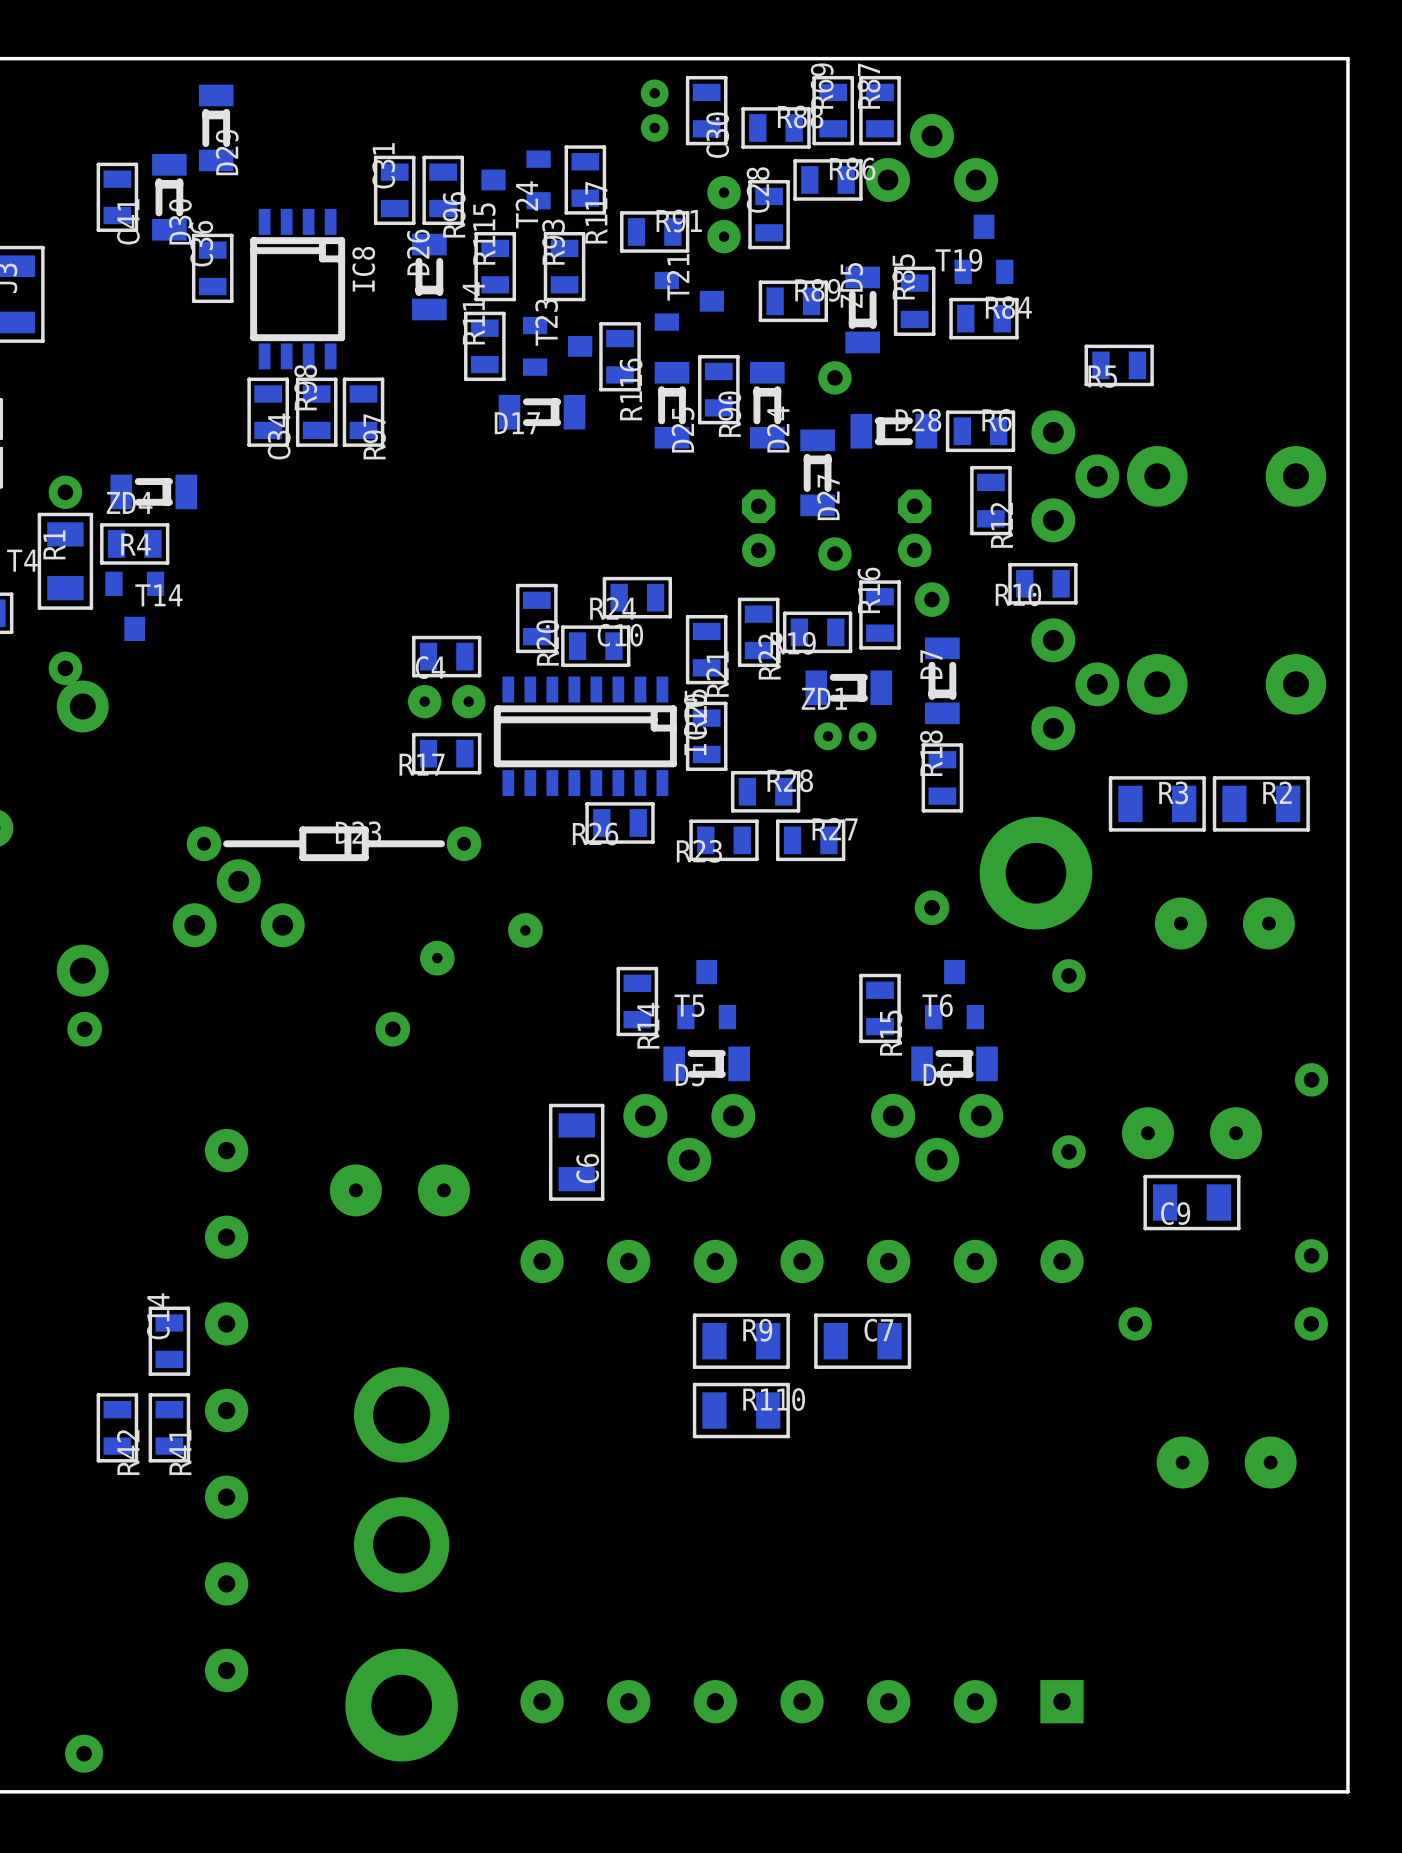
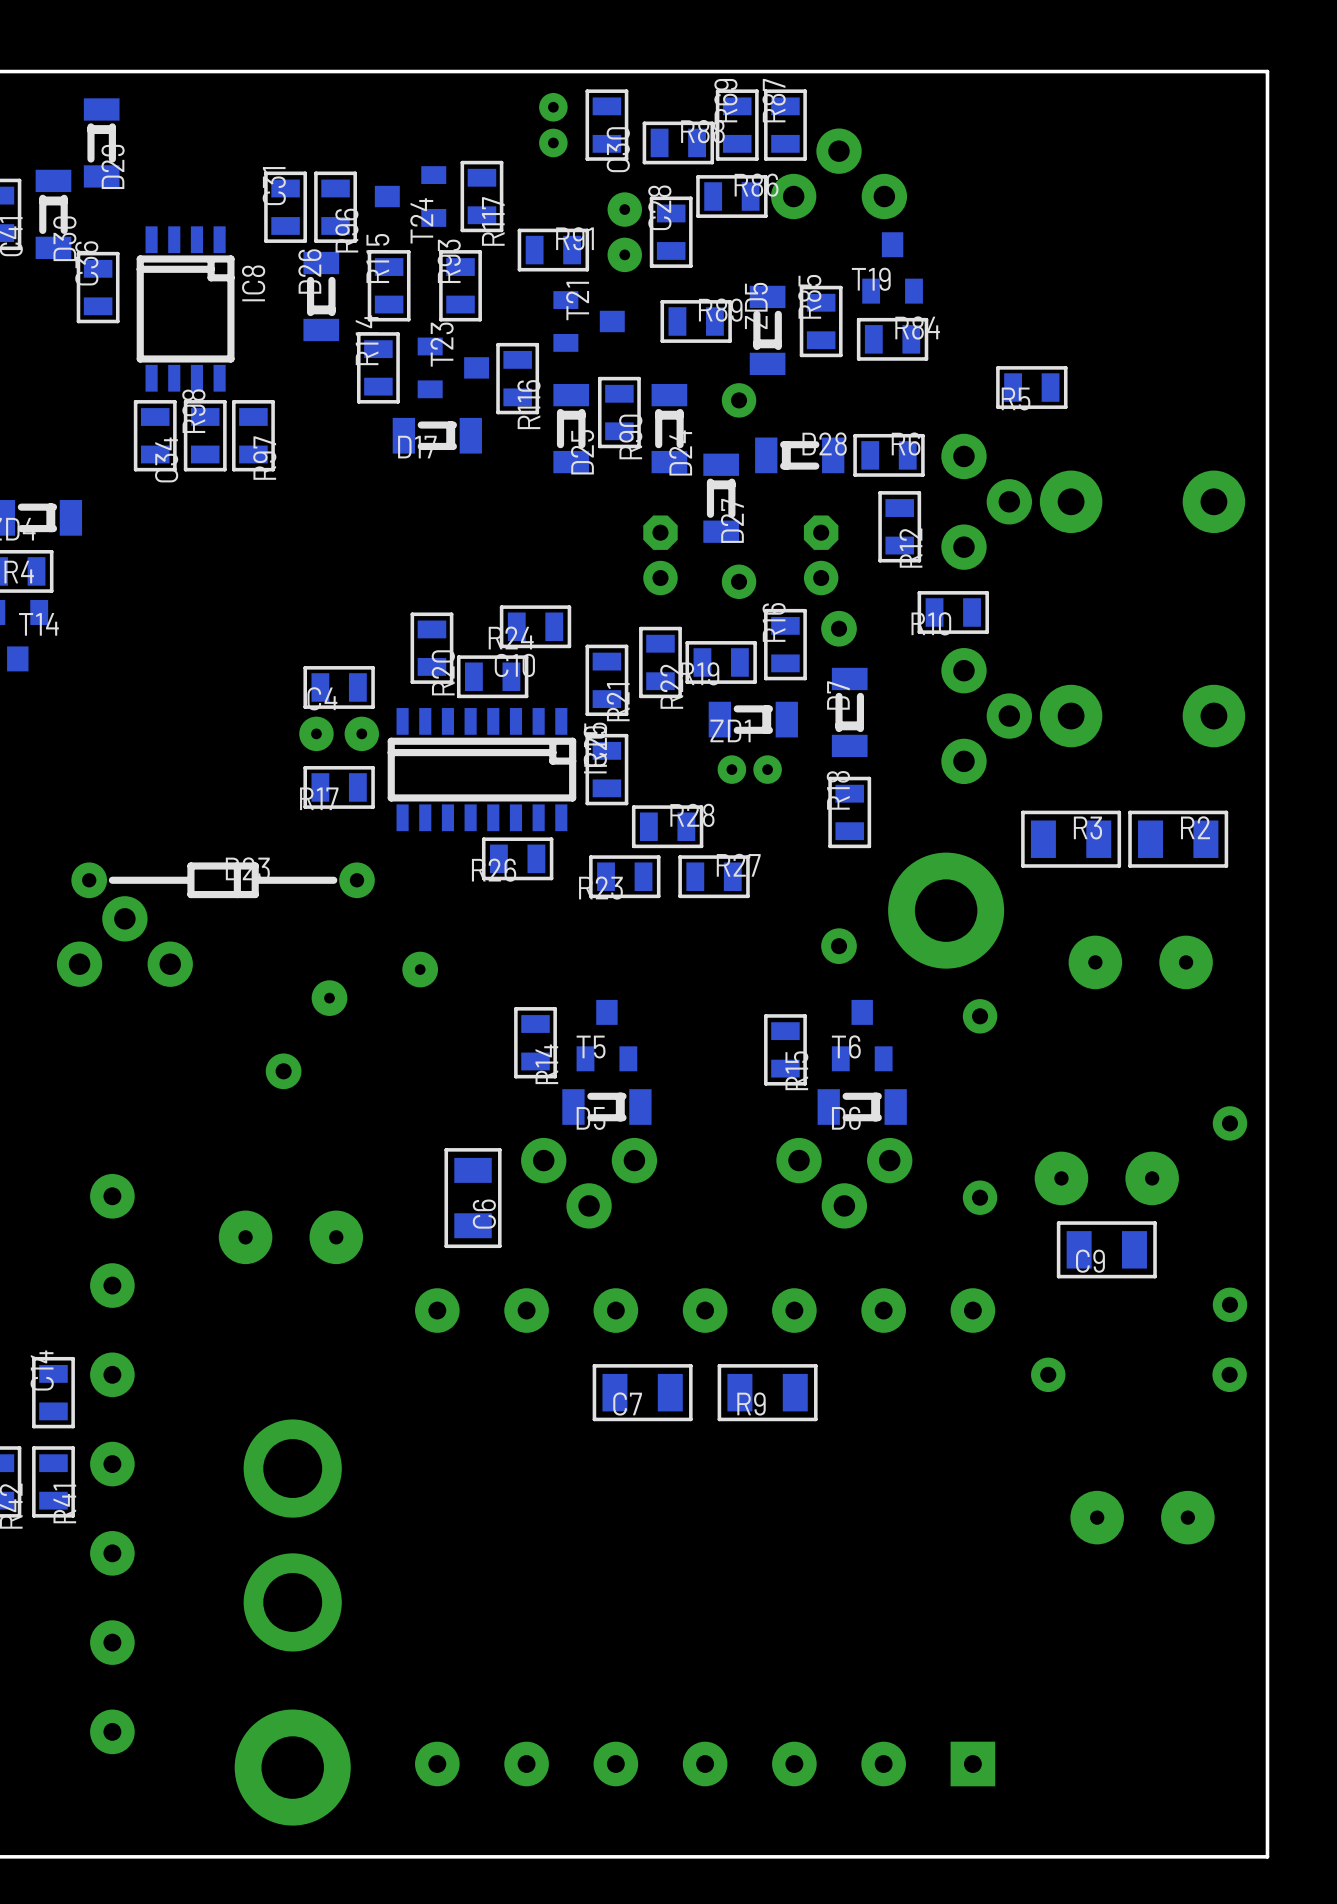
R9 name: R9 (757, 1330) -> C7 (627, 1404)
C7 name: C7 (878, 1330) -> R9 (751, 1404)
R110: (741, 1410) -> none

